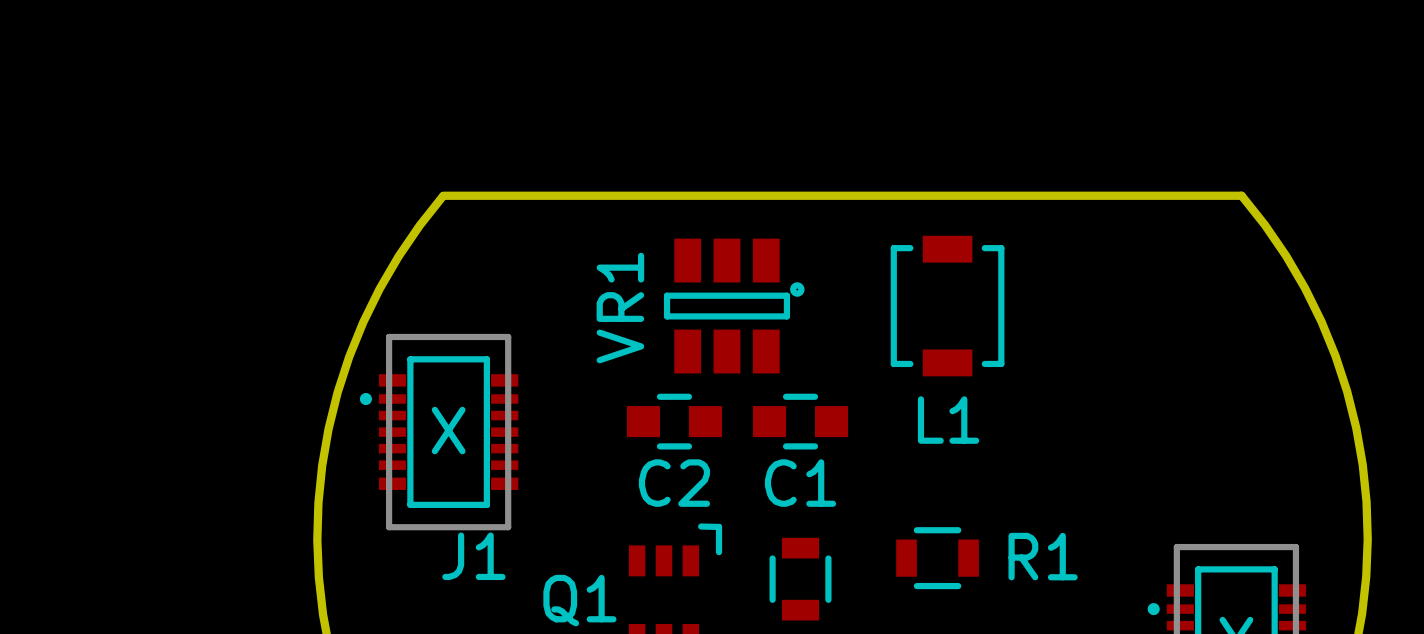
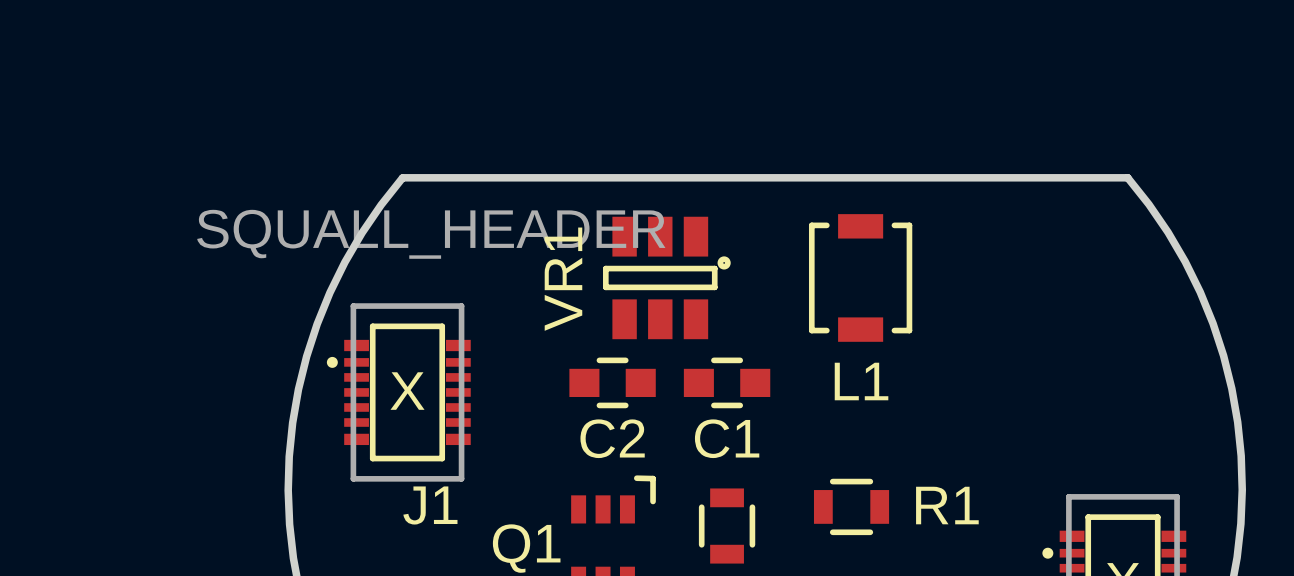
J1 value: none -> SQUALL_HEADER (431, 234)

